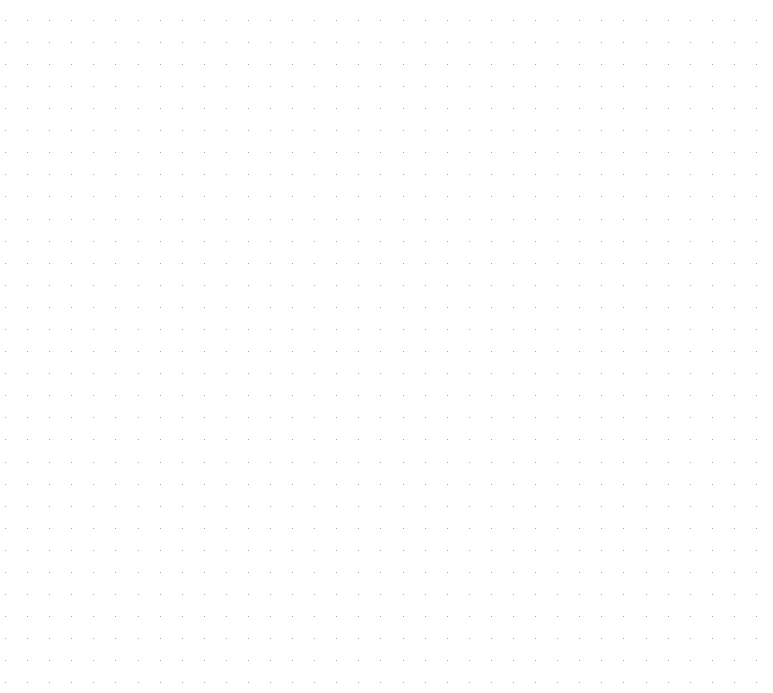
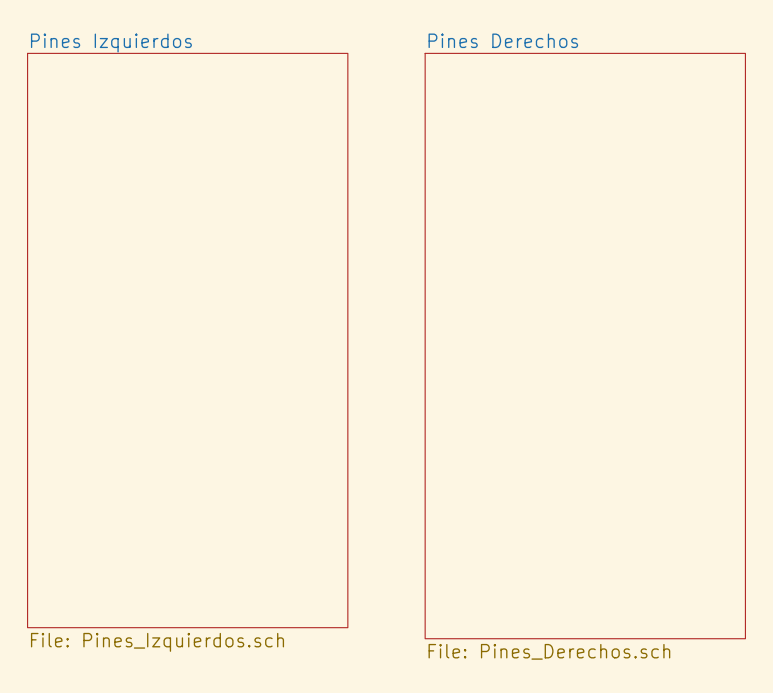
sheet Pines Izquierdos: none -> File: Pines_Izquierdos.sch (187, 340)
sheet Pines Derechos: none -> File: Pines_Derechos.sch (585, 346)

